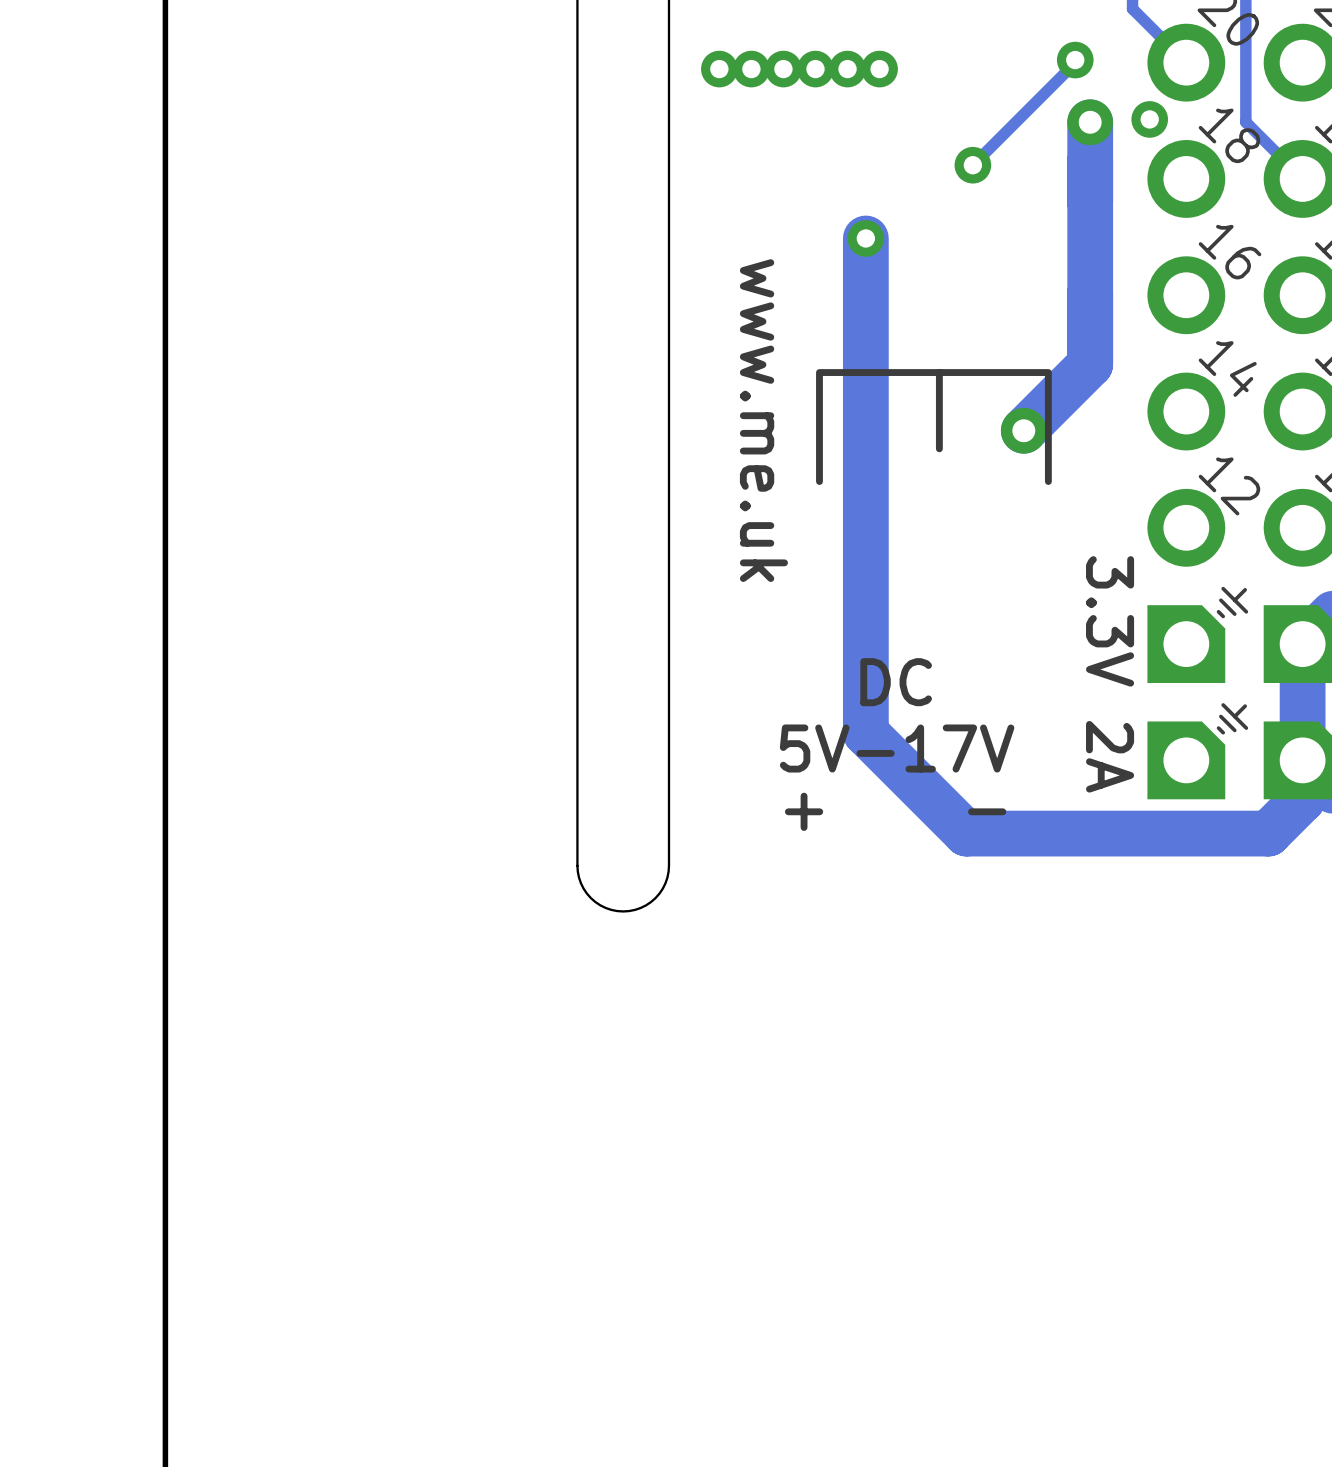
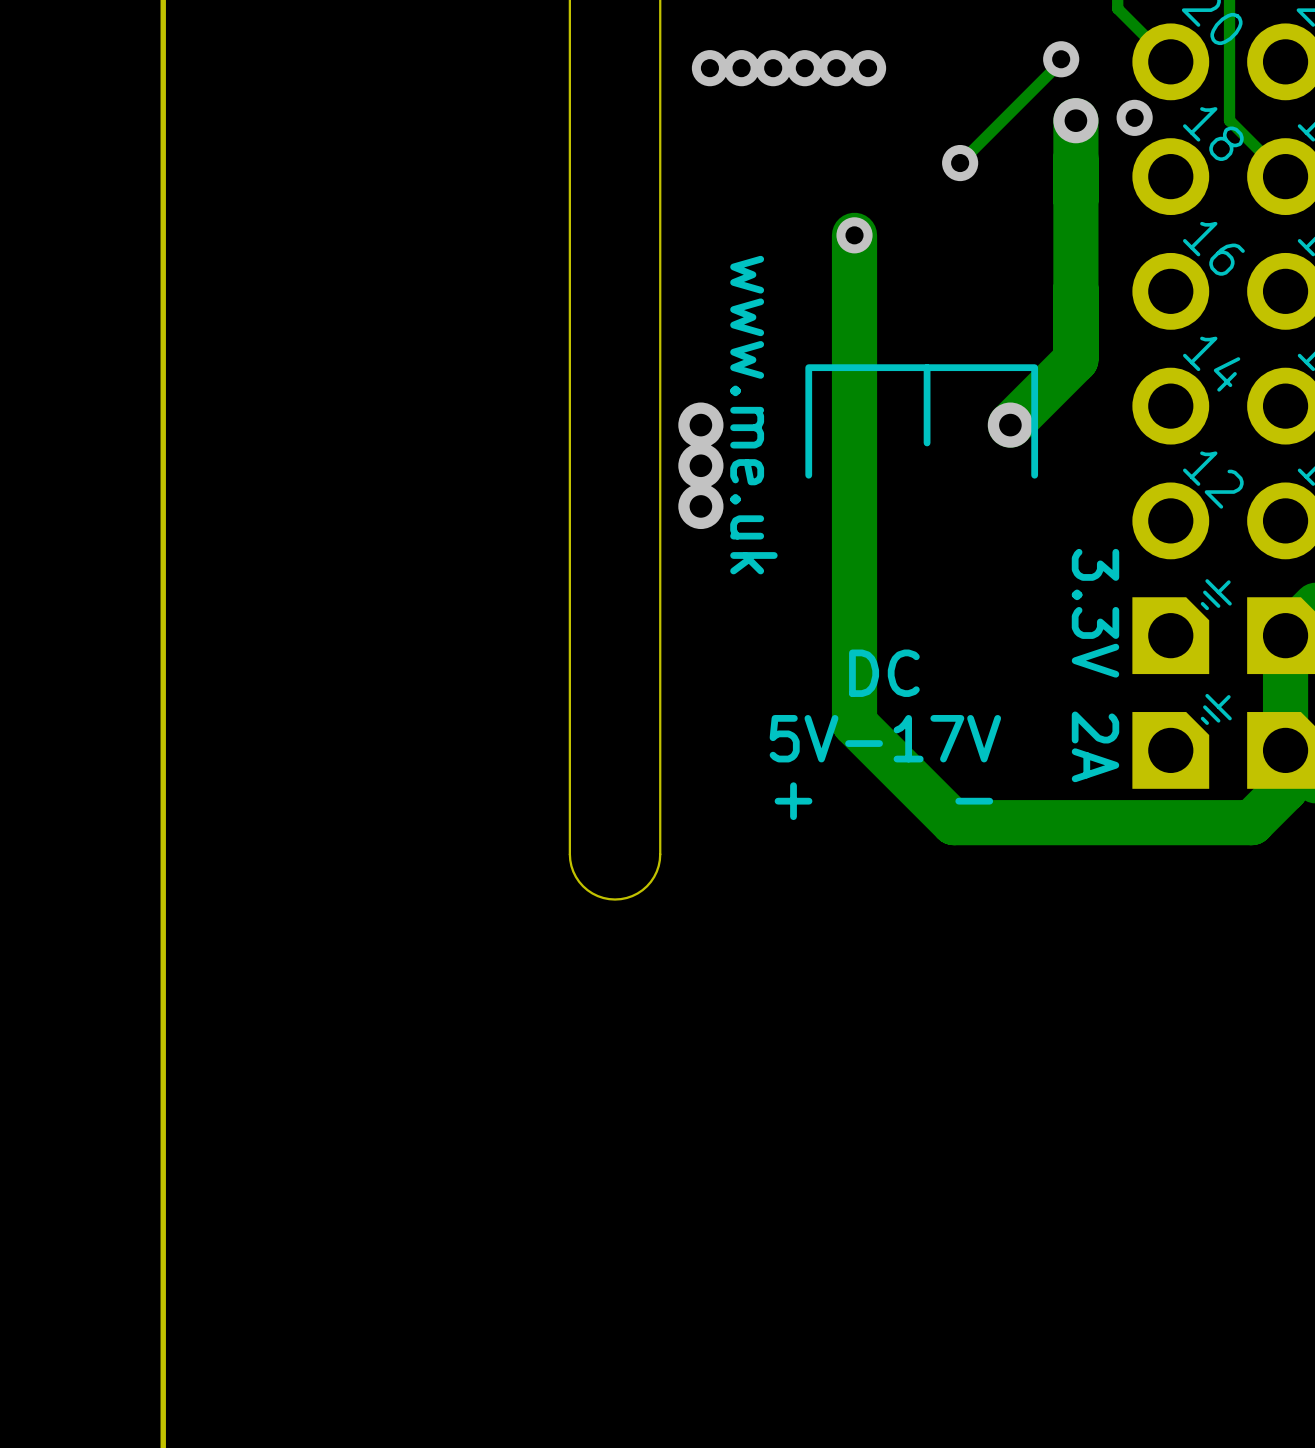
via: none -> (700, 425)
via: none -> (700, 465)
via: none -> (700, 506)

